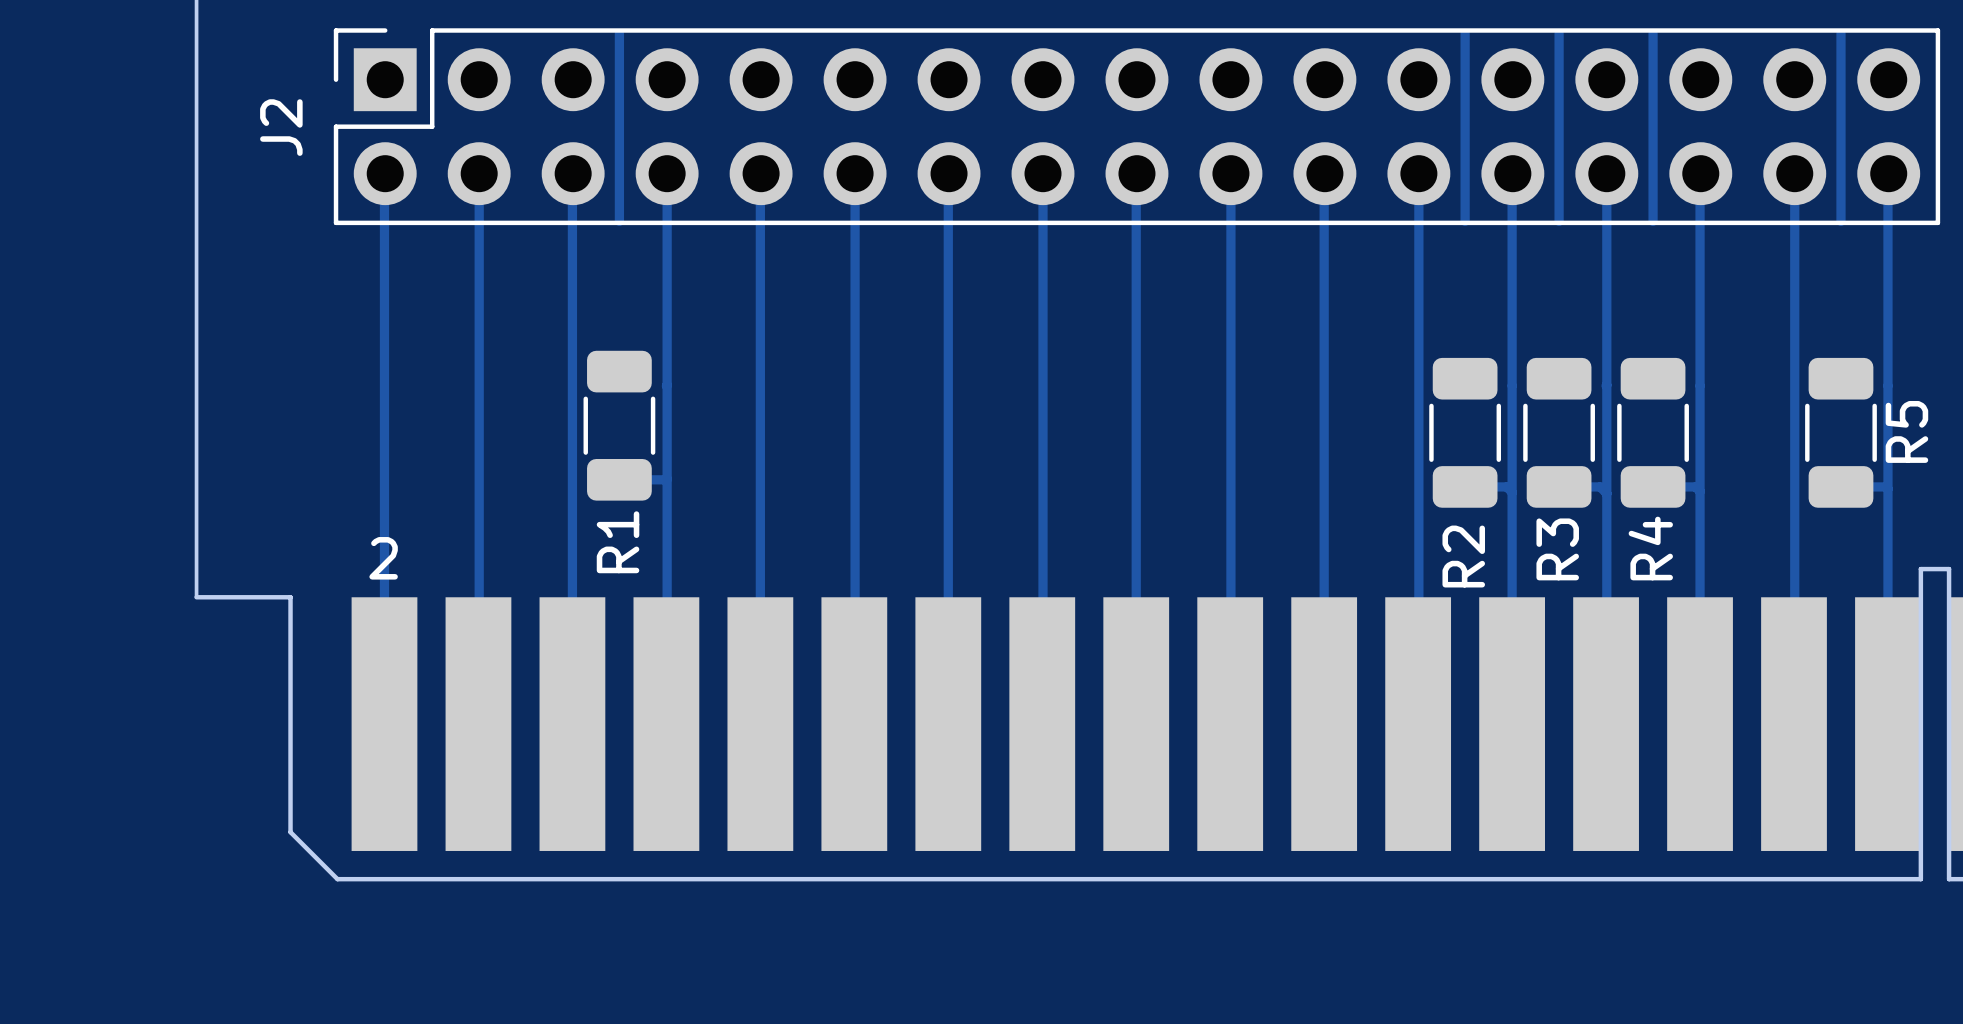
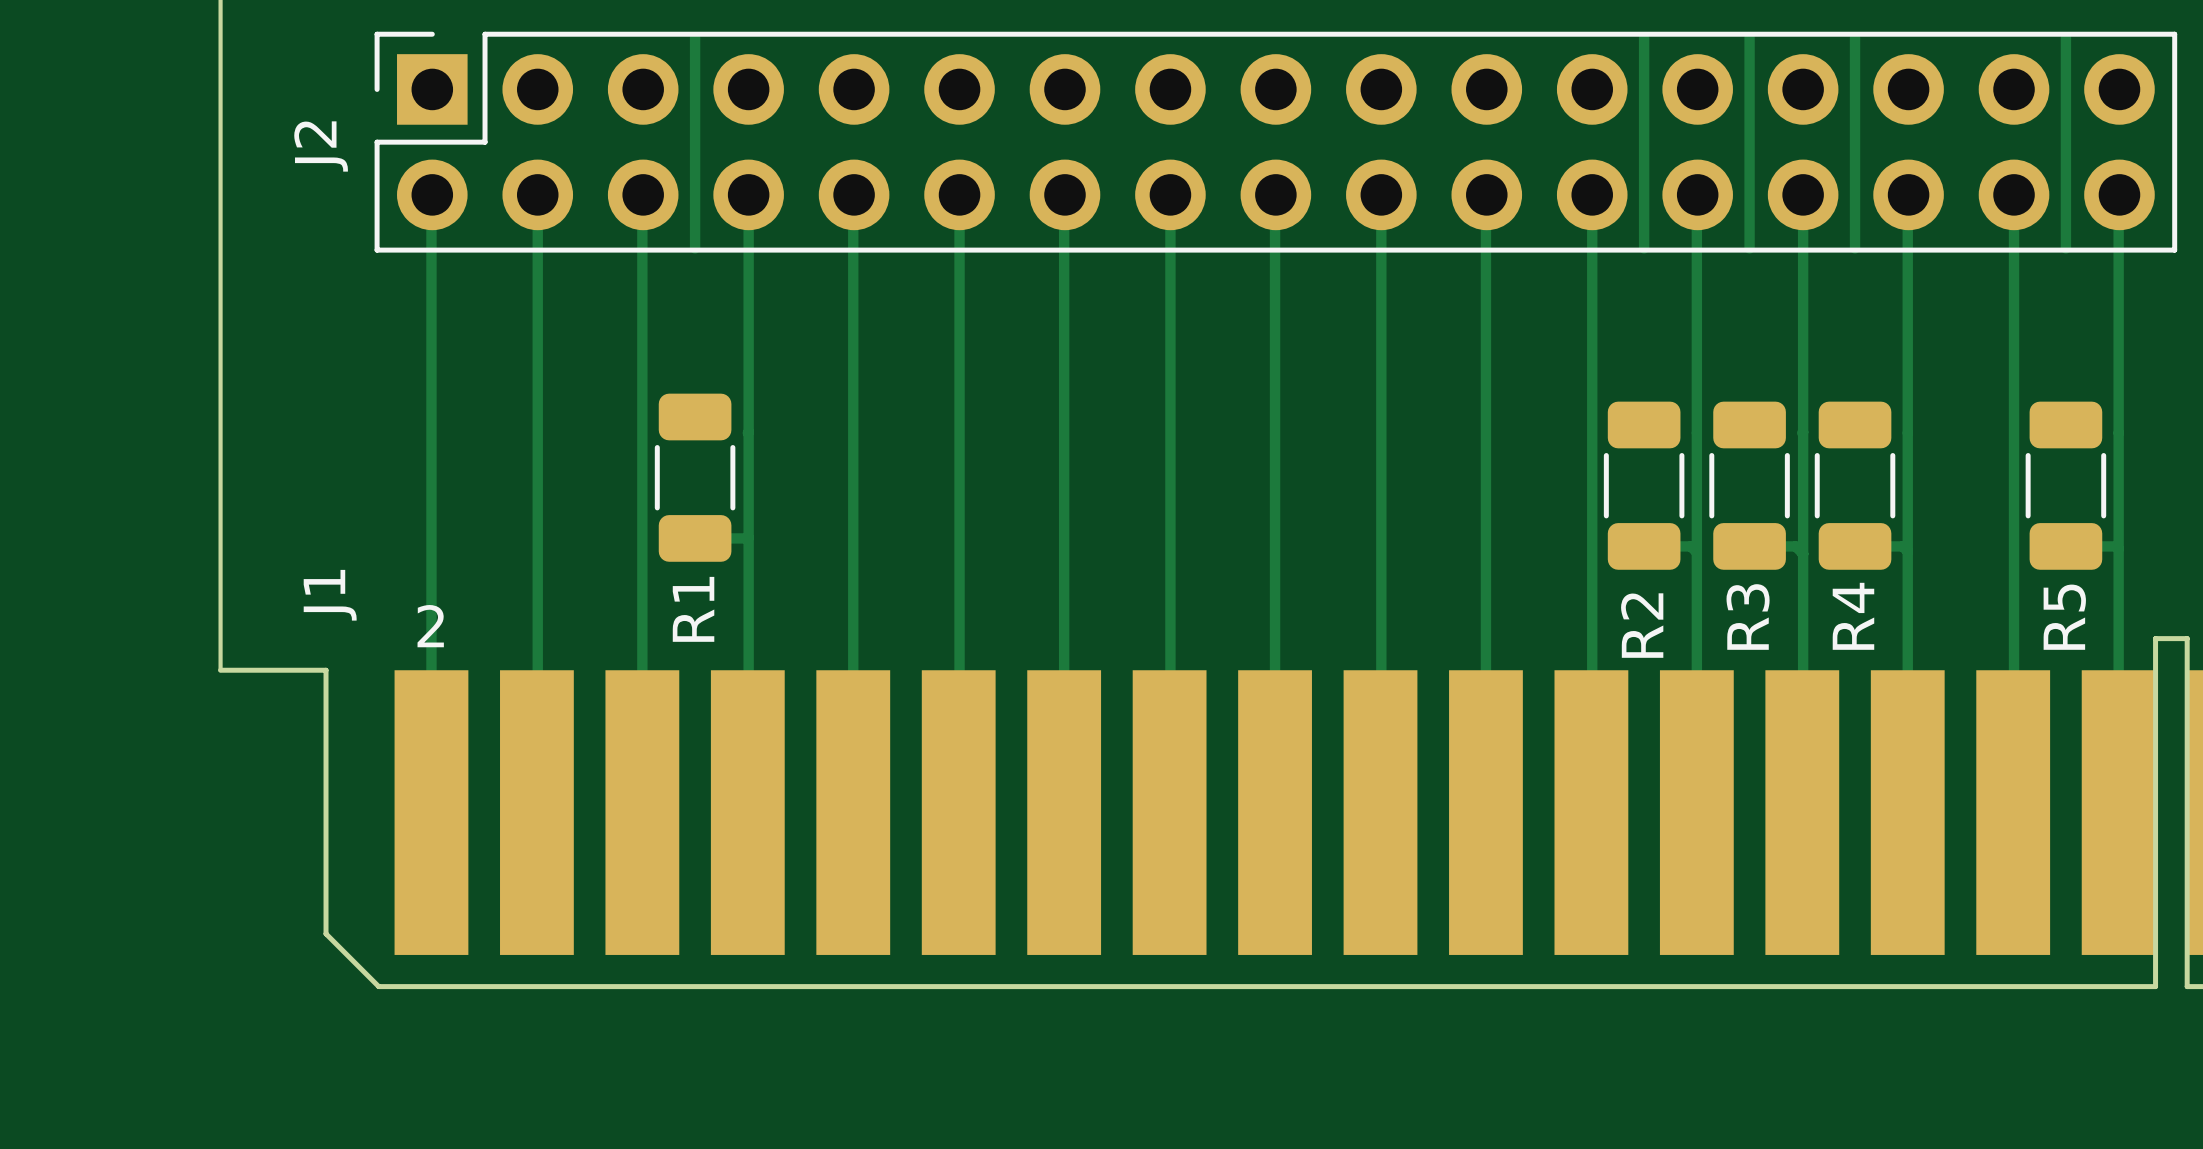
R5 name position: R5 (1906, 431) -> R5 (2064, 617)
J1 name: none -> J1 (330, 595)

